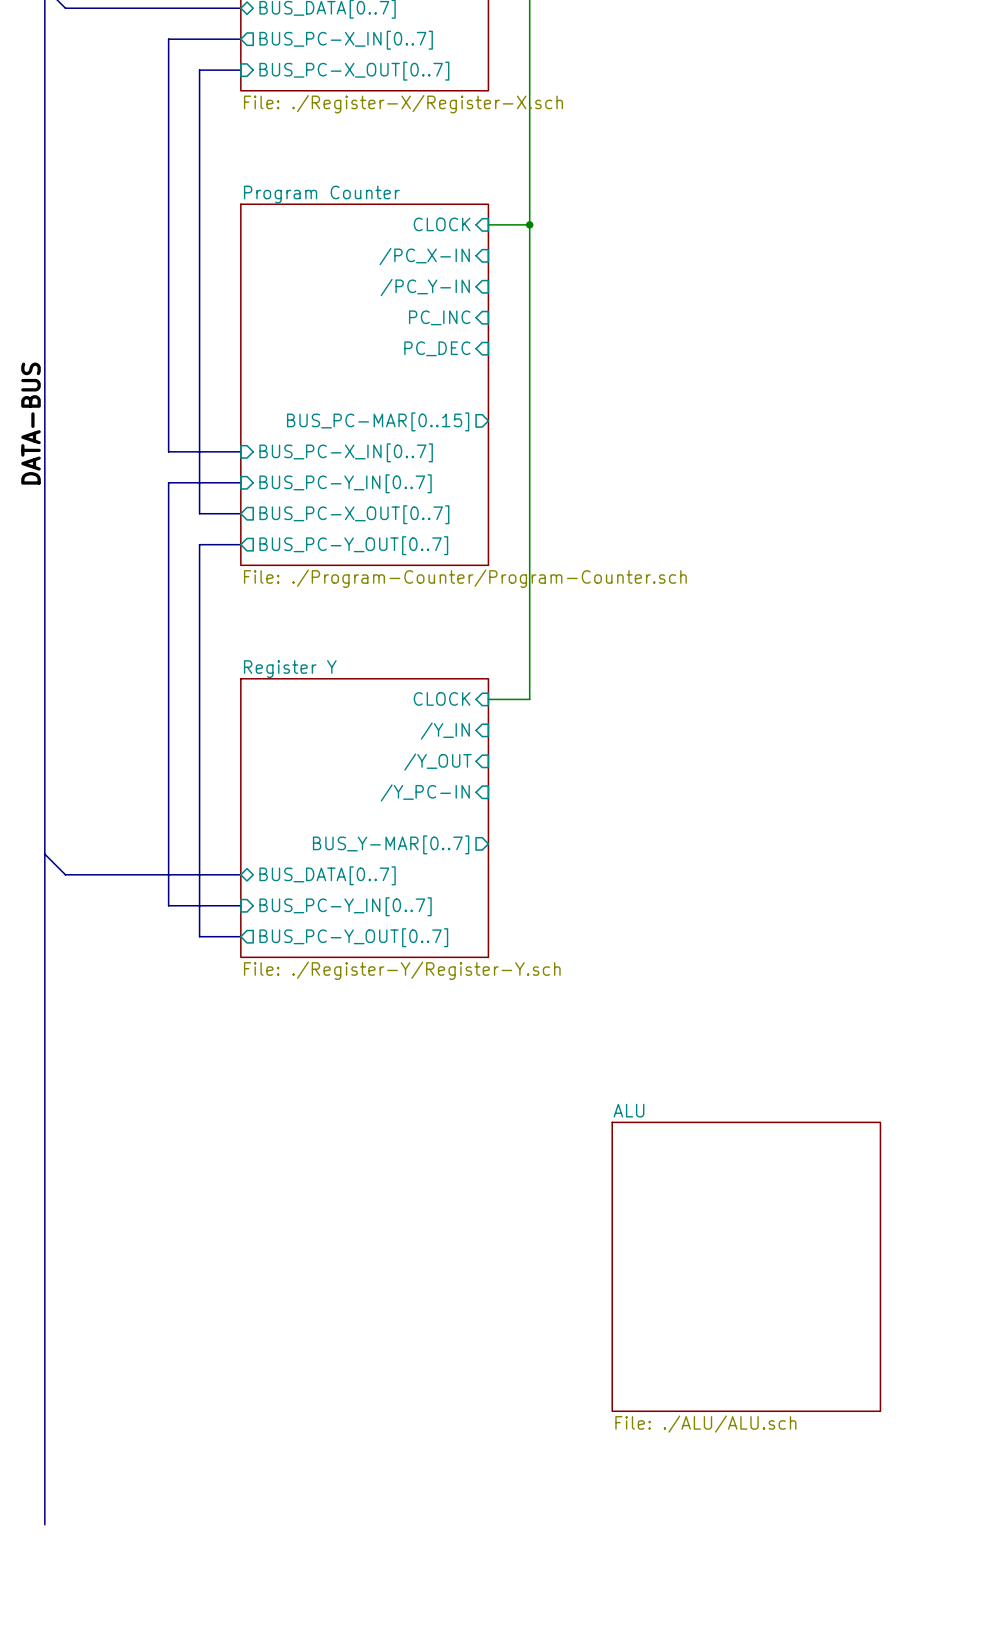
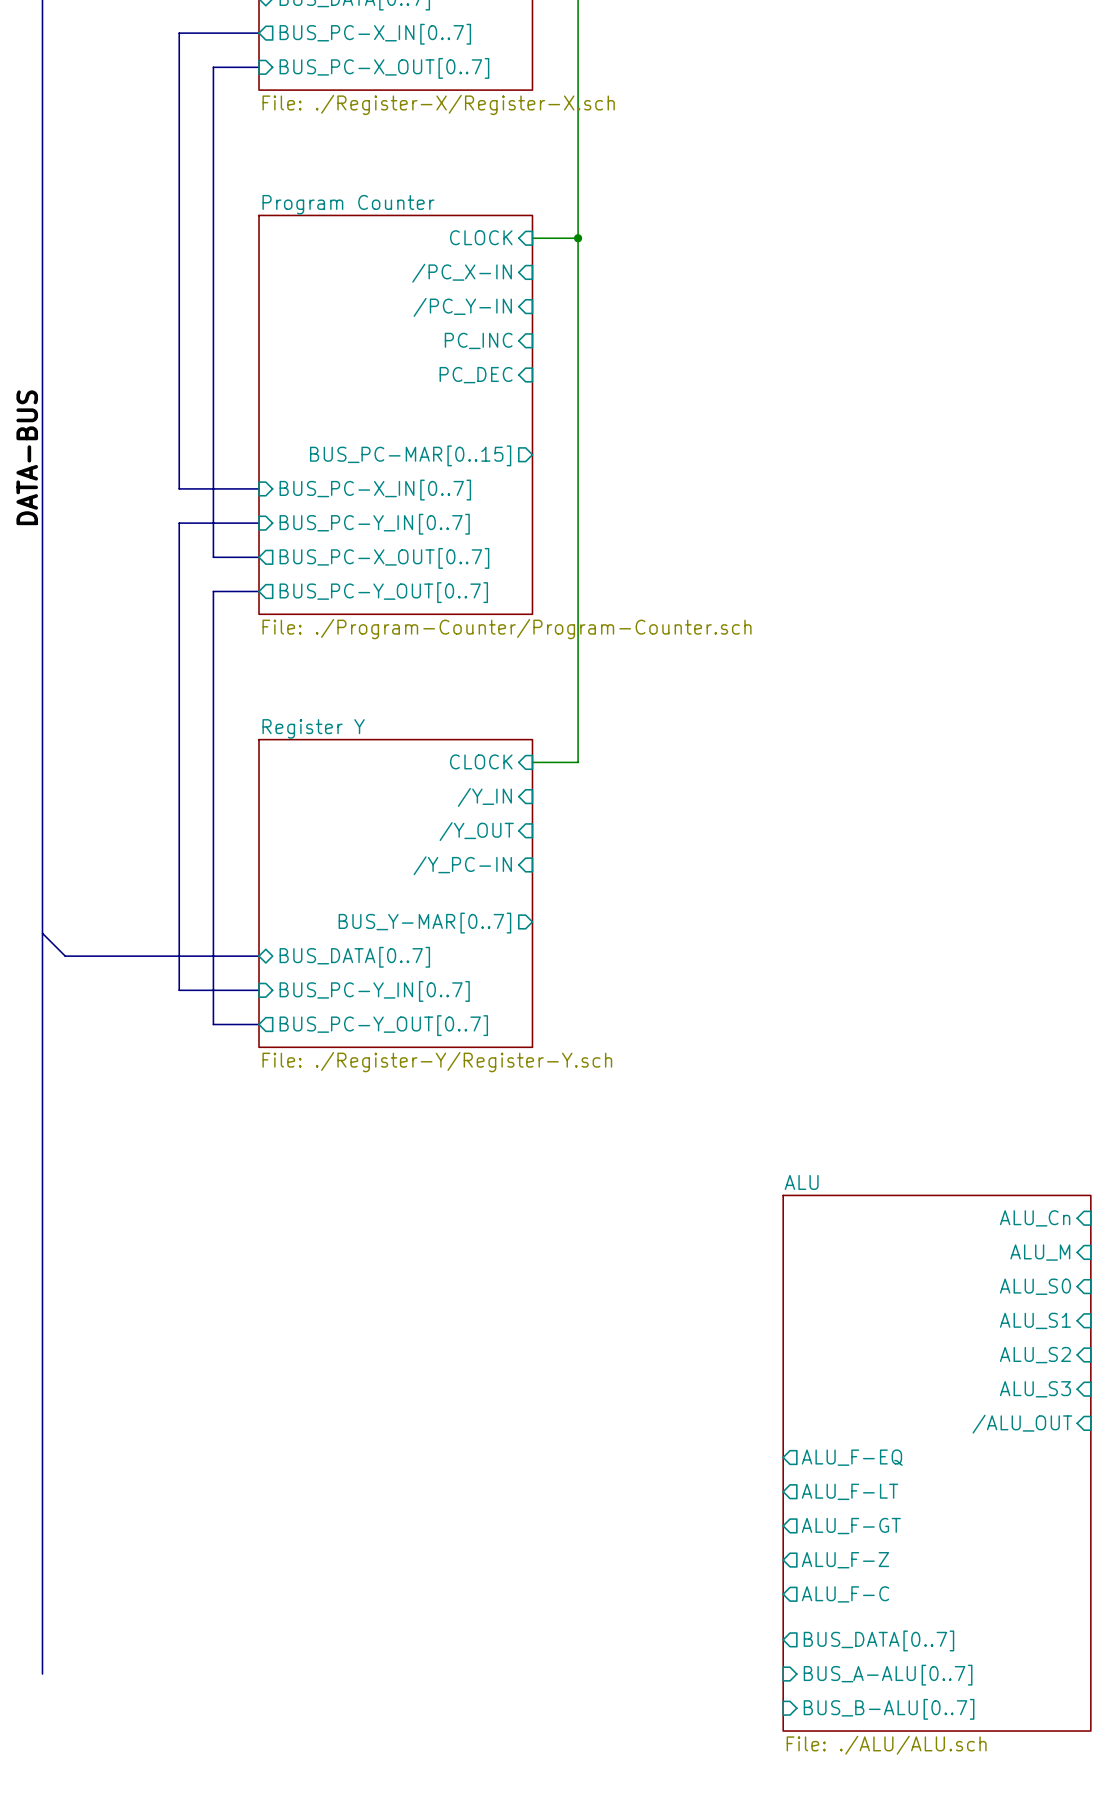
sheet pin: none -> ALU_Cn (1035, 1218)
sheet pin: none -> ALU_M (1040, 1252)
sheet pin: none -> ALU_S0 (1035, 1286)
sheet pin: none -> ALU_S1 (1035, 1320)
sheet pin: none -> ALU_S2 (1035, 1355)
sheet ALU: File: ./ALU/ALU.sch (746, 1266) -> none
sheet pin: none -> ALU_S3 (1035, 1389)
sheet pin: none -> /ALU_OUT (1022, 1424)
sheet pin: none -> ALU_F-EQ (852, 1457)
sheet ALU: none -> File: ./ALU/ALU.sch (937, 1463)
sheet pin: none -> ALU_F-LT (850, 1491)
sheet pin: none -> ALU_F-GT (851, 1526)
sheet pin: none -> ALU_F-Z (845, 1560)
sheet pin: none -> ALU_F-C (845, 1594)
sheet pin: none -> BUS_DATA[0..7] (878, 1640)
sheet pin: none -> BUS_A-ALU[0..7] (888, 1675)
sheet pin: none -> BUS_B-ALU[0..7] (889, 1709)

